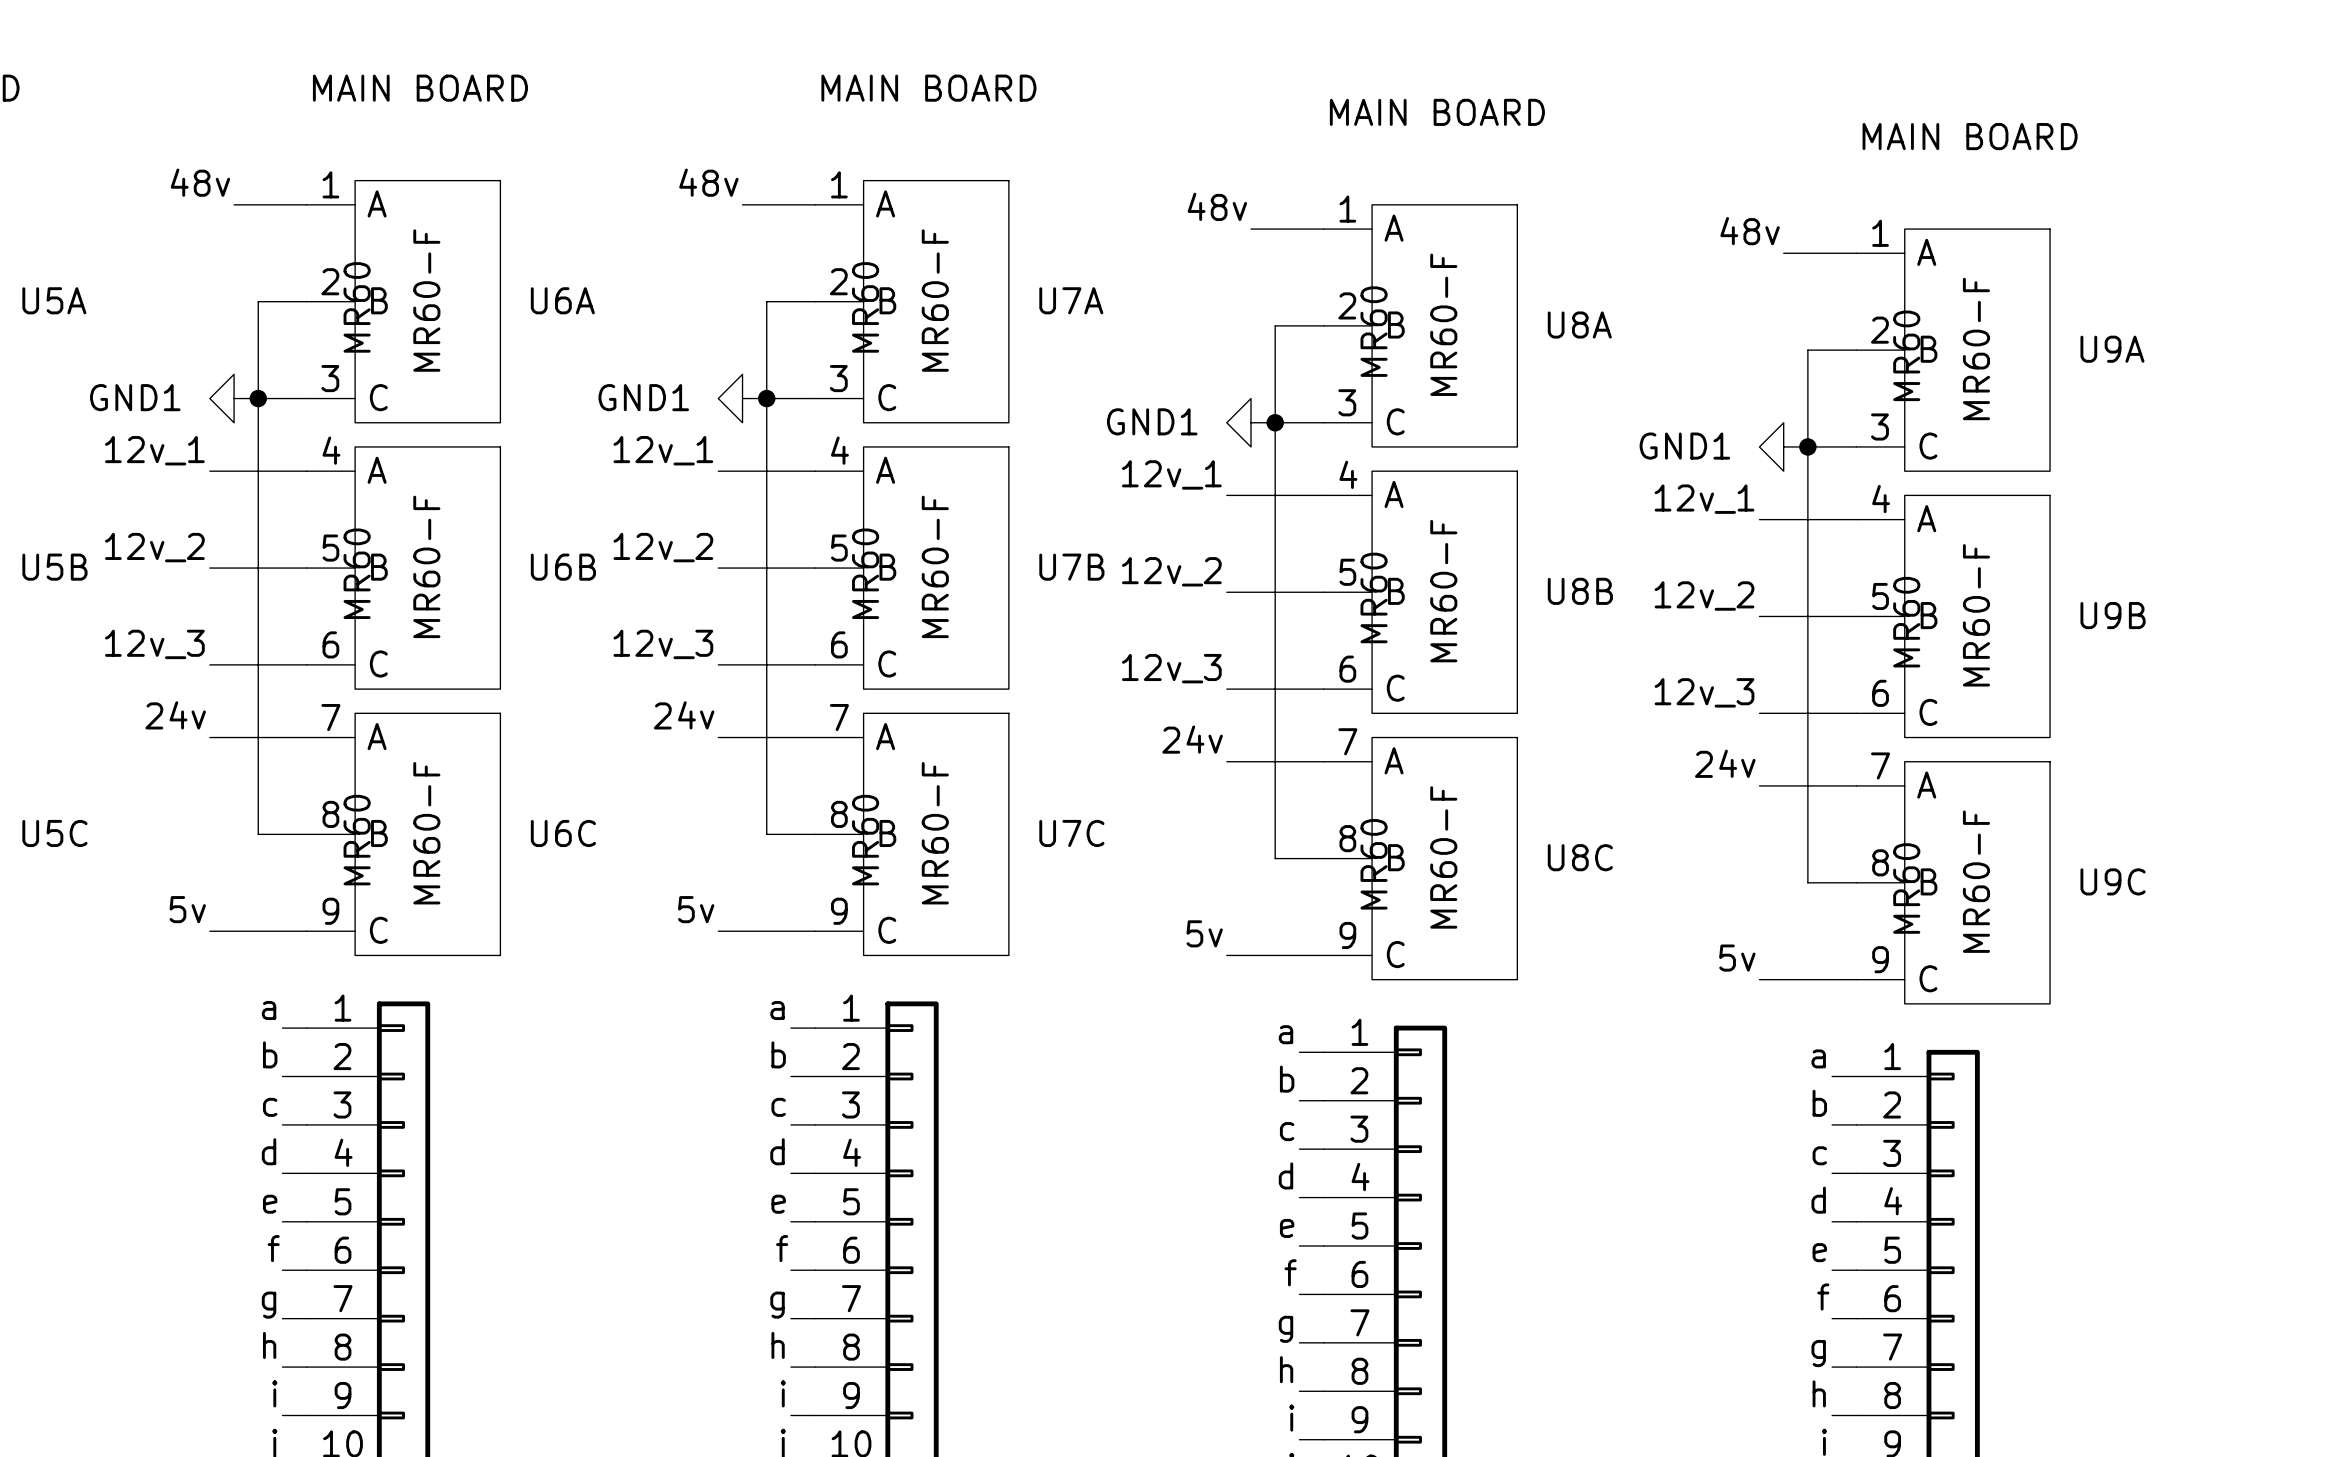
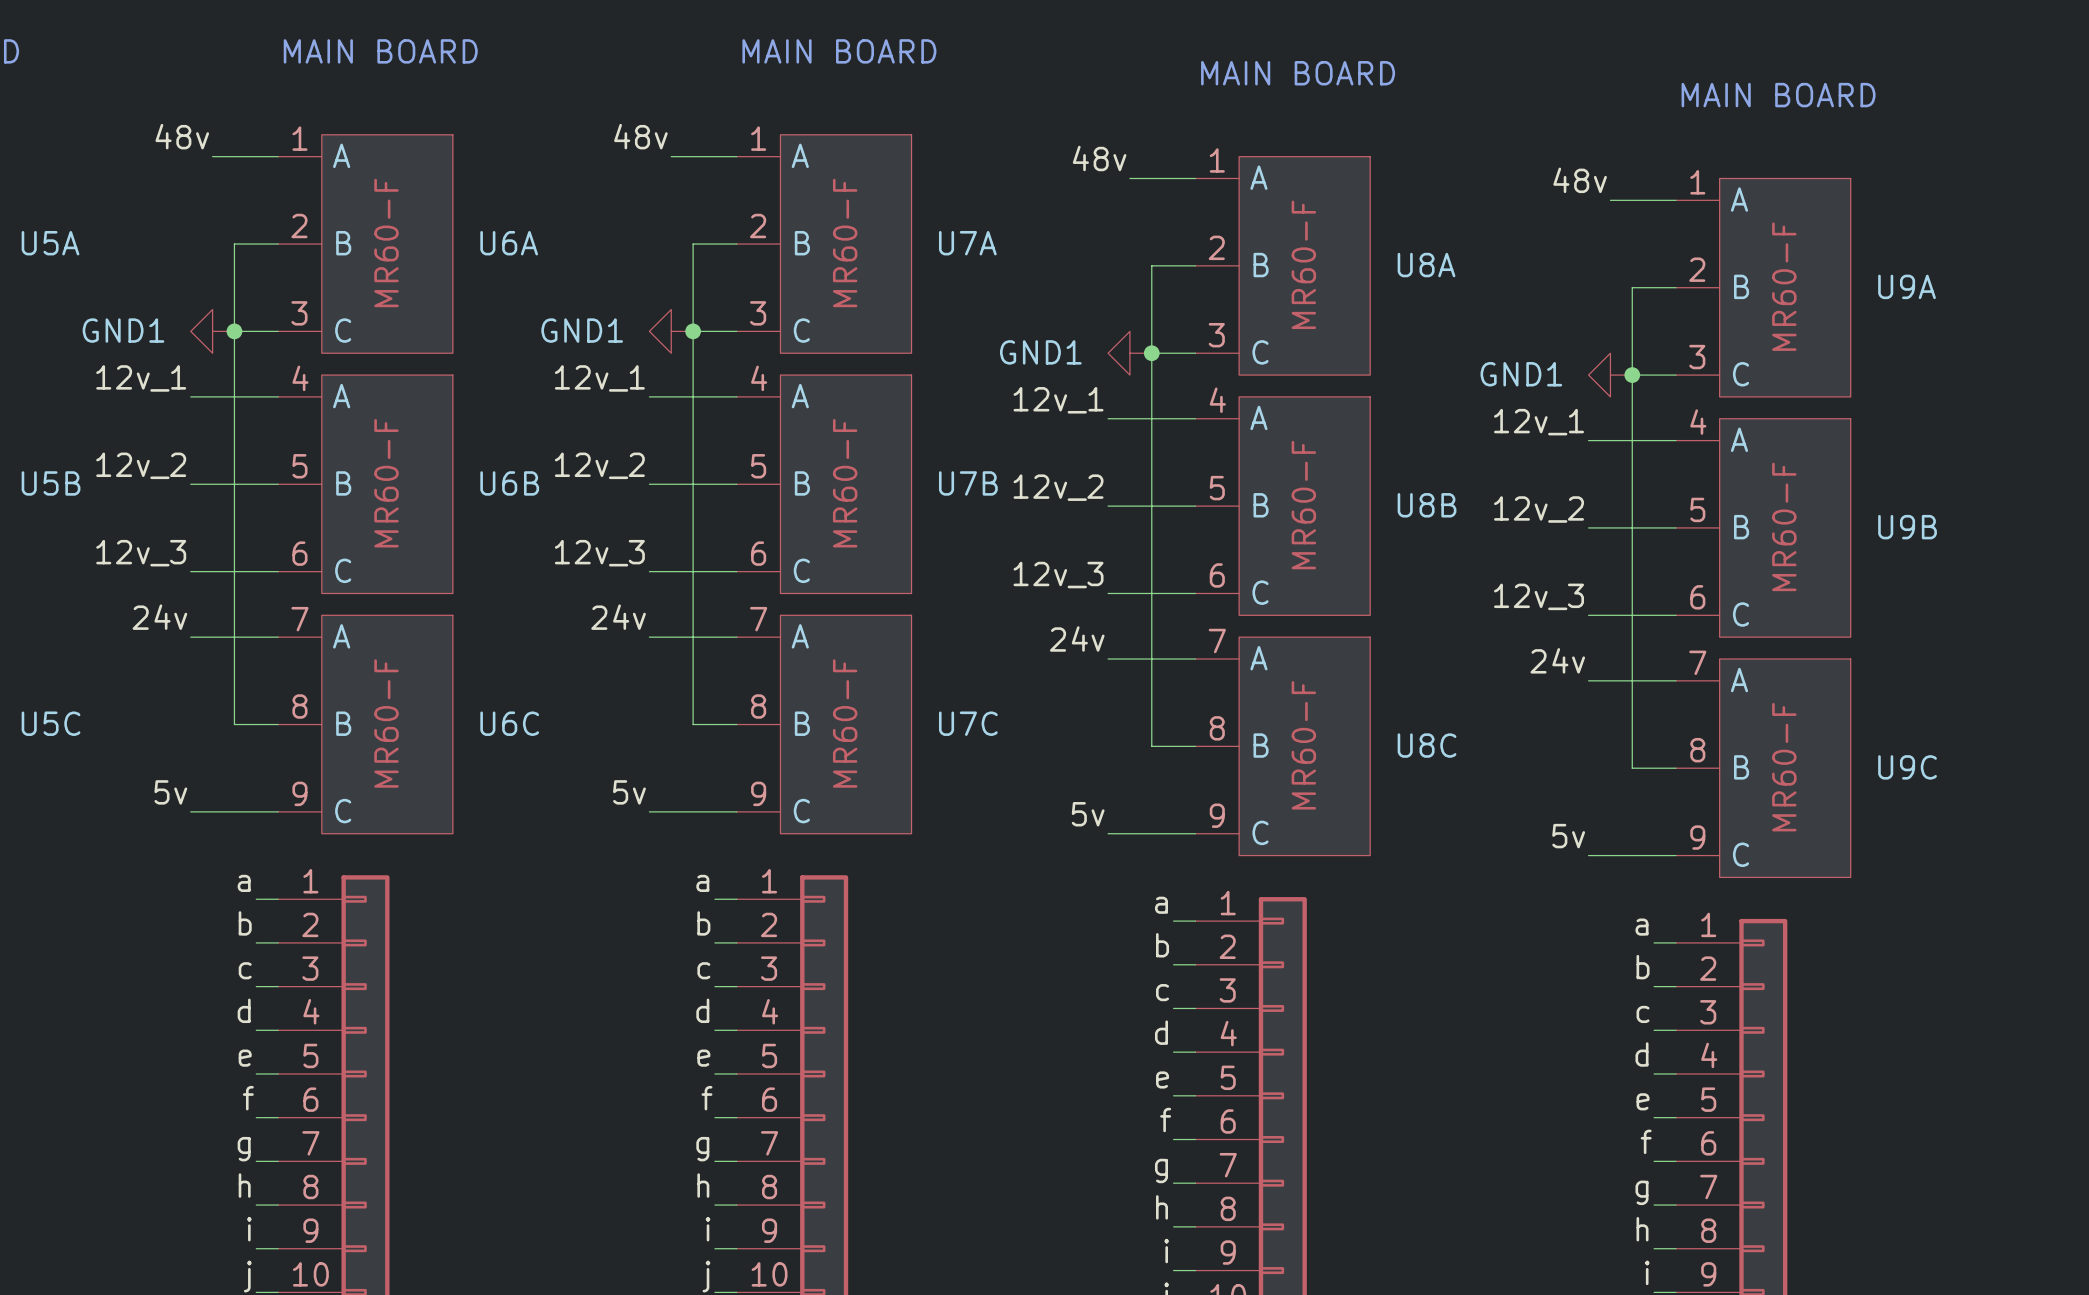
U6A value: MR60 (357, 307) -> none
U7A value: MR60 (865, 307) -> none
U8A value: MR60 (1374, 331) -> none
U9A value: MR60 (1906, 355) -> none
U6B value: MR60 (357, 573) -> none
U7B value: MR60 (865, 573) -> none
U8B value: MR60 (1374, 597) -> none
U9B value: MR60 (1906, 622) -> none
U6C value: MR60 (357, 840) -> none
U7C value: MR60 (865, 840) -> none
U8C value: MR60 (1374, 864) -> none
U9C value: MR60 (1906, 888) -> none

